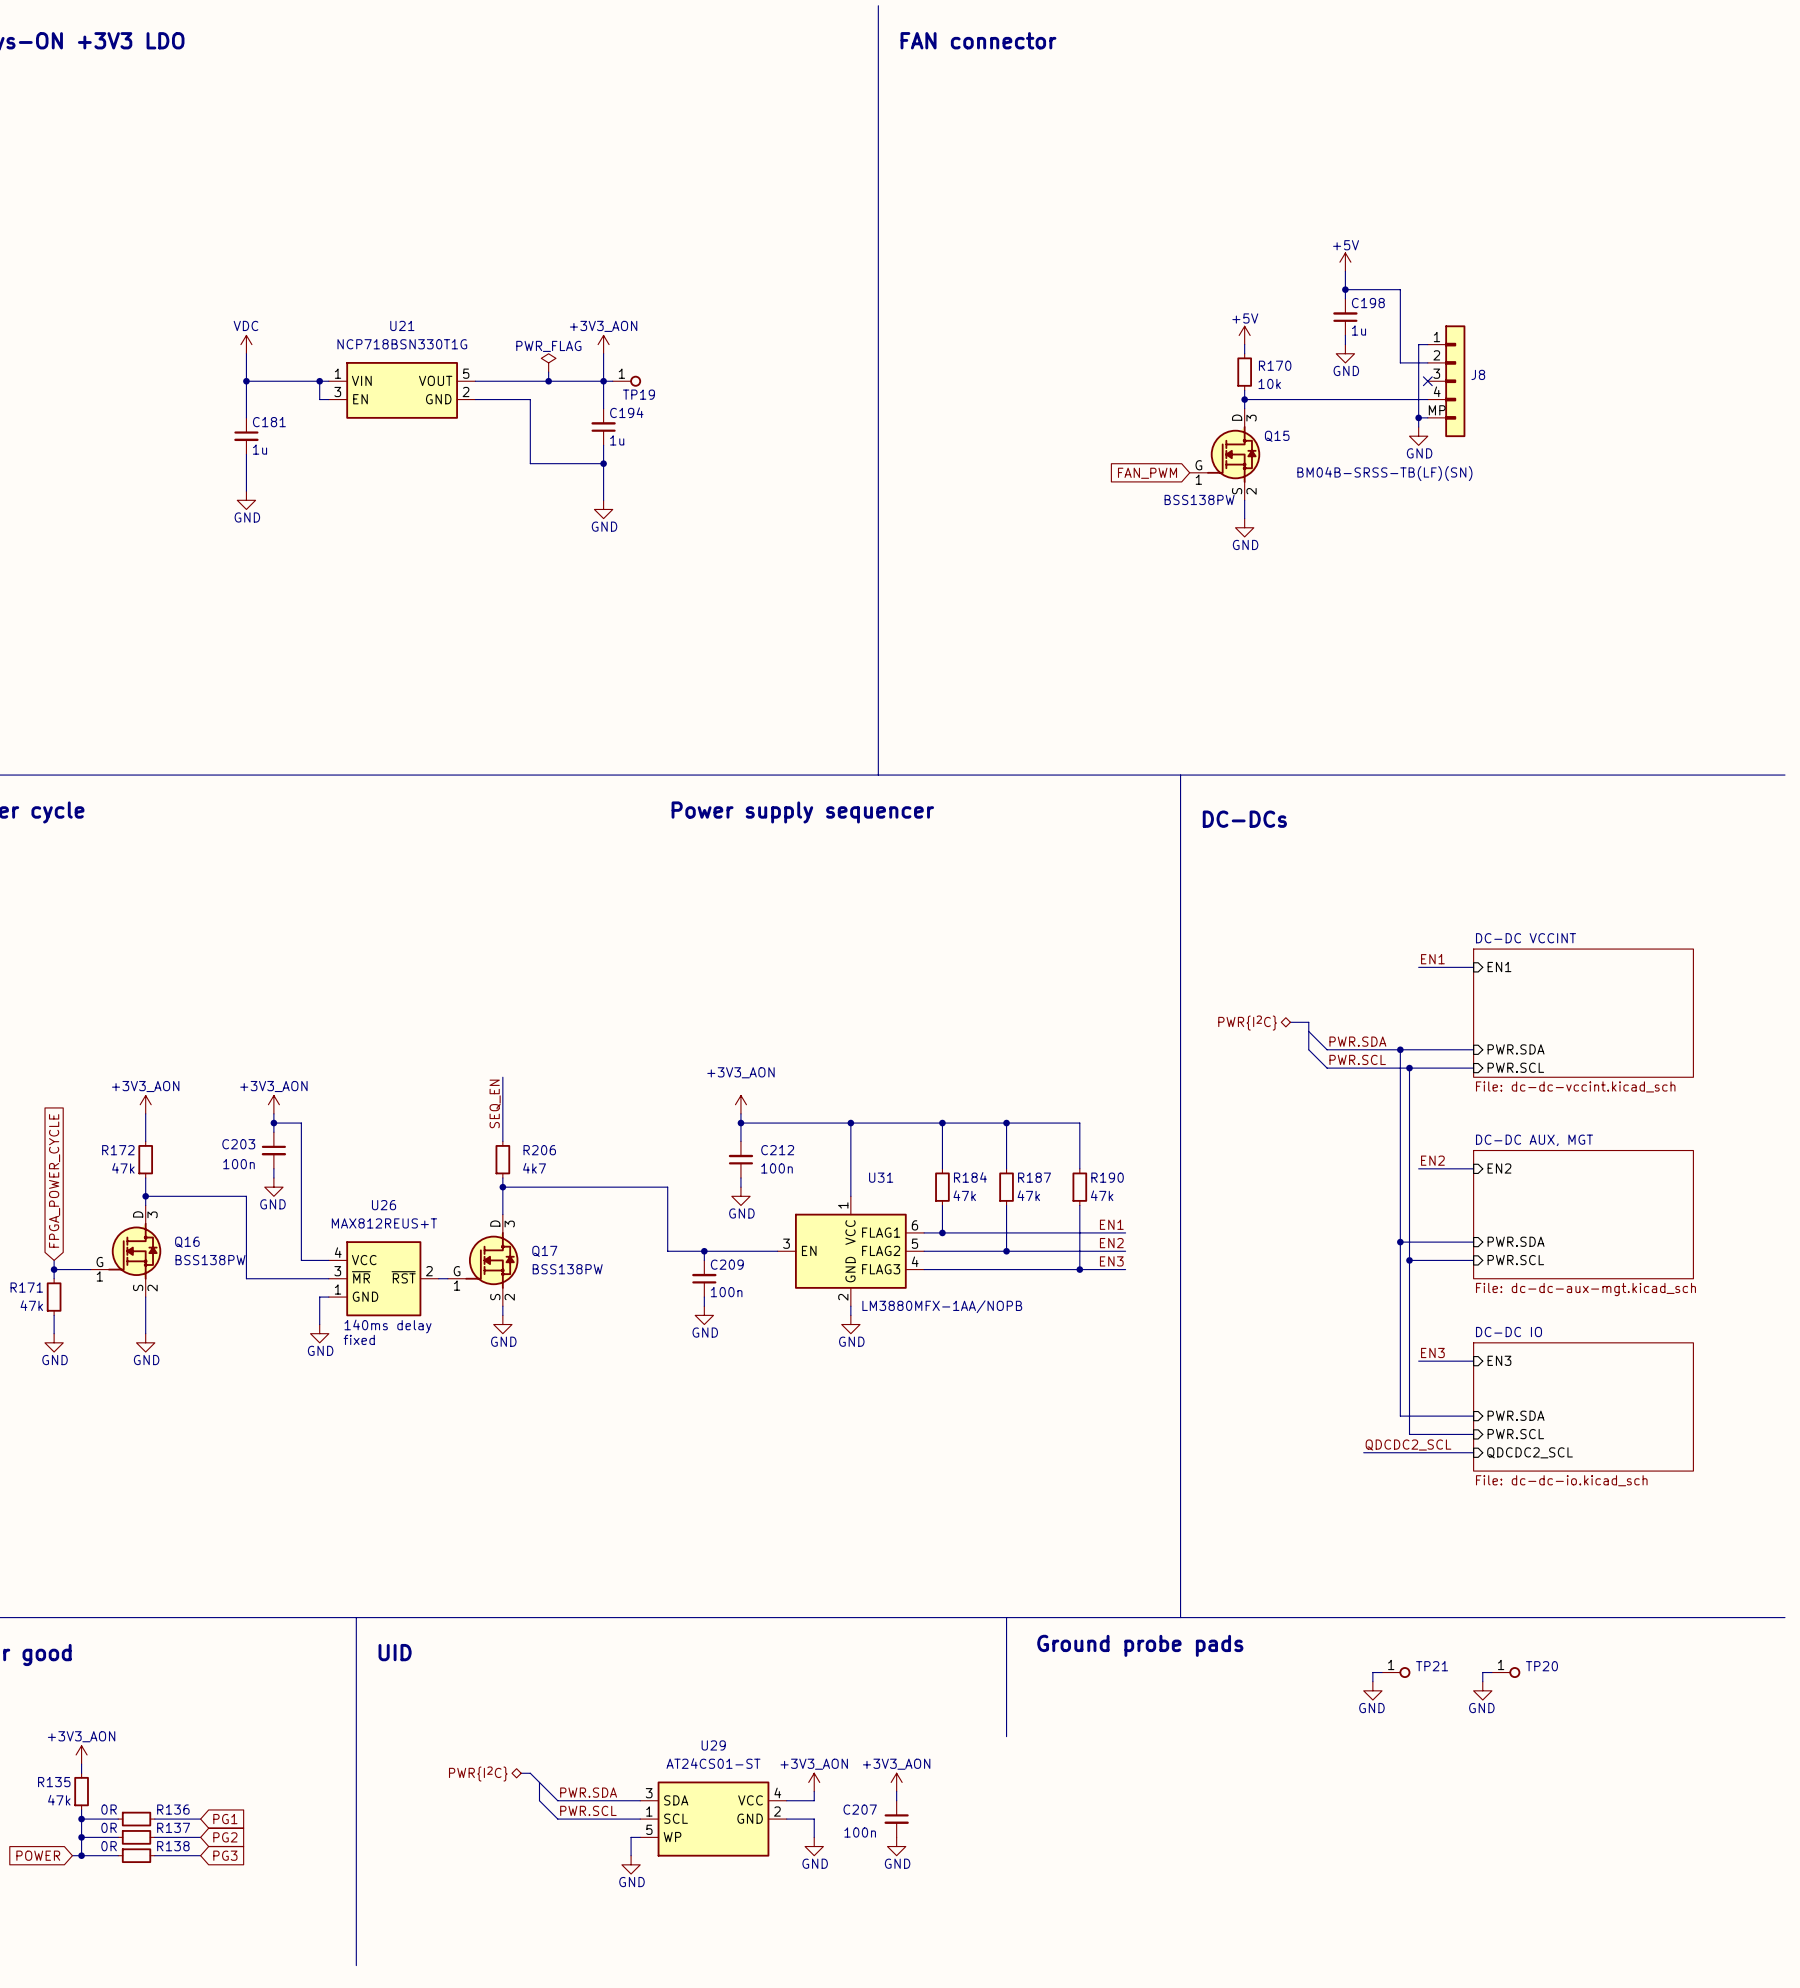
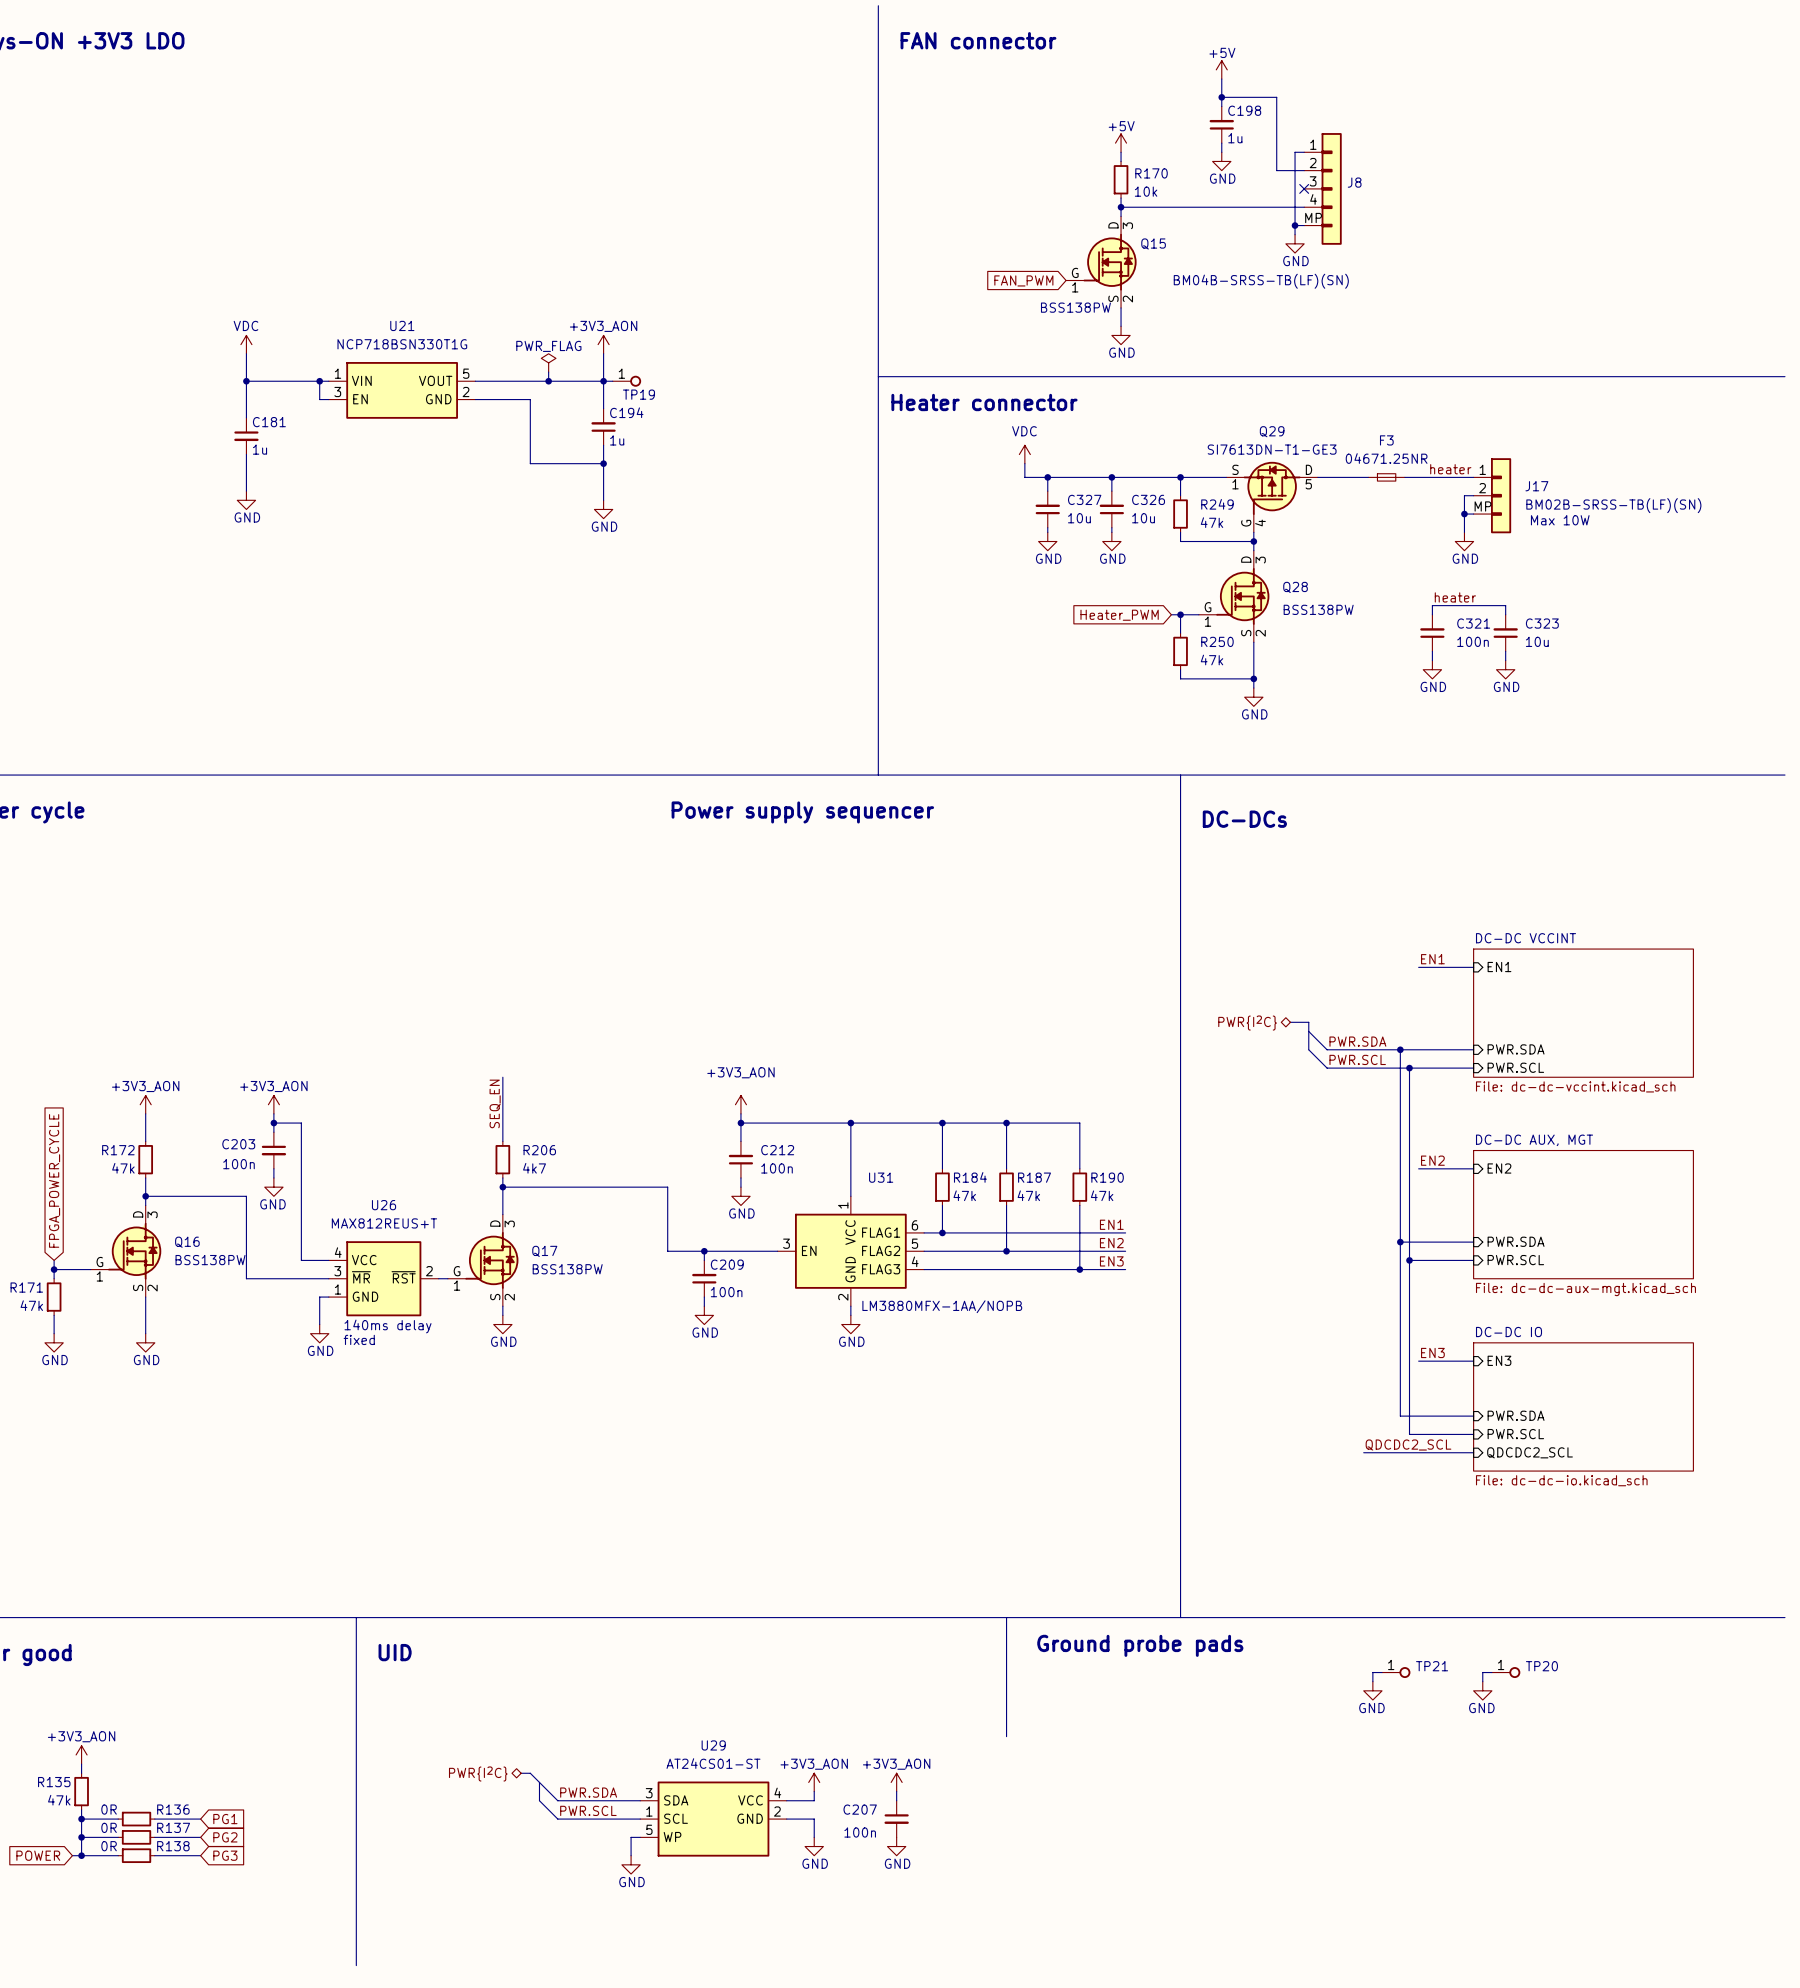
power symbol: none -> +5V (1221, 69)
wire: none -> (1221, 79) (1221, 106)
wire: none -> (1221, 97) (1276, 97) (1276, 170) (1304, 170)
junction: none -> (1221, 97)
power symbol: none -> +5V (1121, 143)
wire: none -> (1221, 143) (1221, 152)
wire: none -> (1121, 152) (1121, 161)
wire: none -> (1304, 152) (1295, 152) (1295, 234)
power symbol: none -> GND (1221, 161)
no-connect mark: none -> (1304, 188)
wire: none -> (1121, 198) (1121, 216)
wire: none -> (1121, 207) (1304, 207)
junction: none -> (1121, 207)
wire: none -> (1295, 225) (1304, 225)
junction: none -> (1295, 225)
power symbol: none -> GND (1295, 243)
power symbol: +5V (1345, 262) -> none
wire: (1345, 271) (1345, 298) -> none
global label: none -> FAN_PWM (1023, 280)
wire: (1345, 289) (1400, 289) (1400, 362) (1427, 362) -> none
junction: (1345, 289) -> none
wire: none -> (1121, 307) (1121, 326)
C198 position: (1345, 317) -> (1221, 124)
power symbol: none -> GND (1121, 335)
power symbol: +5V (1244, 335) -> none
wire: (1345, 335) (1345, 344) -> none
wire: (1244, 344) (1244, 353) -> none
wire: (1427, 344) (1418, 344) (1418, 427) -> none
power symbol: GND (1345, 353) -> none
R170 position: (1244, 372) -> (1121, 179)
line: none -> (878, 376) (1784, 376)
no-connect mark: (1427, 381) -> none
J8 position: (1446, 381) -> (1322, 188)
wire: (1244, 390) (1244, 408) -> (1180, 477) (1180, 495)
wire: (1244, 399) (1427, 399) -> none
junction: (1244, 399) -> none
text: none -> Heater connector (984, 402)
wire: (1418, 417) (1427, 417) -> (1464, 514) (1473, 514)
junction: (1418, 417) -> none
power symbol: GND (1418, 436) -> none
power symbol: none -> VDC (1024, 454)
Q15 position: (1224, 454) -> (1101, 262)
wire: none -> (1024, 463) (1024, 477) (1226, 477)
label: none -> heater (1450, 469)
global label: FAN_PWM (1147, 473) -> none
wire: none -> (1047, 477) (1047, 491)
junction: none -> (1047, 477)
wire: none -> (1111, 477) (1111, 491)
junction: none -> (1111, 477)
junction: none -> (1180, 477)
wire: none -> (1317, 477) (1368, 477)
F3: none -> (1386, 477)
wire: none -> (1404, 477) (1473, 477)
wire: none -> (1473, 495) (1464, 495) (1464, 532)
J17: none -> (1492, 495)
Q29: none -> (1272, 497)
wire: (1244, 500) (1244, 518) -> (1253, 532) (1253, 550)
C327: none -> (1047, 509)
C326: none -> (1111, 509)
R249: none -> (1180, 514)
junction: none -> (1464, 514)
text: none -> Max 10W (1560, 520)
wire: none -> (1047, 527) (1047, 532)
wire: none -> (1111, 527) (1111, 532)
power symbol: GND (1244, 527) -> none
wire: none -> (1180, 532) (1180, 541) (1253, 541)
power symbol: none -> GND (1047, 541)
power symbol: none -> GND (1111, 541)
junction: none -> (1253, 541)
power symbol: none -> GND (1464, 541)
Q28: none -> BSS138PW (1234, 596)
label: none -> heater (1455, 597)
wire: none -> (1171, 614) (1198, 614)
wire: none -> (1180, 614) (1180, 633)
junction: none -> (1180, 614)
wire: none -> (1432, 614) (1432, 605) (1505, 605) (1505, 614)
global label: none -> Heater_PWM (1119, 615)
C321: none -> (1432, 633)
C323: none -> (1505, 633)
wire: none -> (1253, 642) (1253, 688)
R250: none -> (1180, 651)
wire: none -> (1432, 651) (1432, 660)
wire: none -> (1505, 651) (1505, 660)
wire: none -> (1180, 669) (1180, 678) (1253, 678)
power symbol: none -> GND (1432, 669)
power symbol: none -> GND (1505, 669)
junction: none -> (1253, 678)
power symbol: none -> GND (1253, 697)

